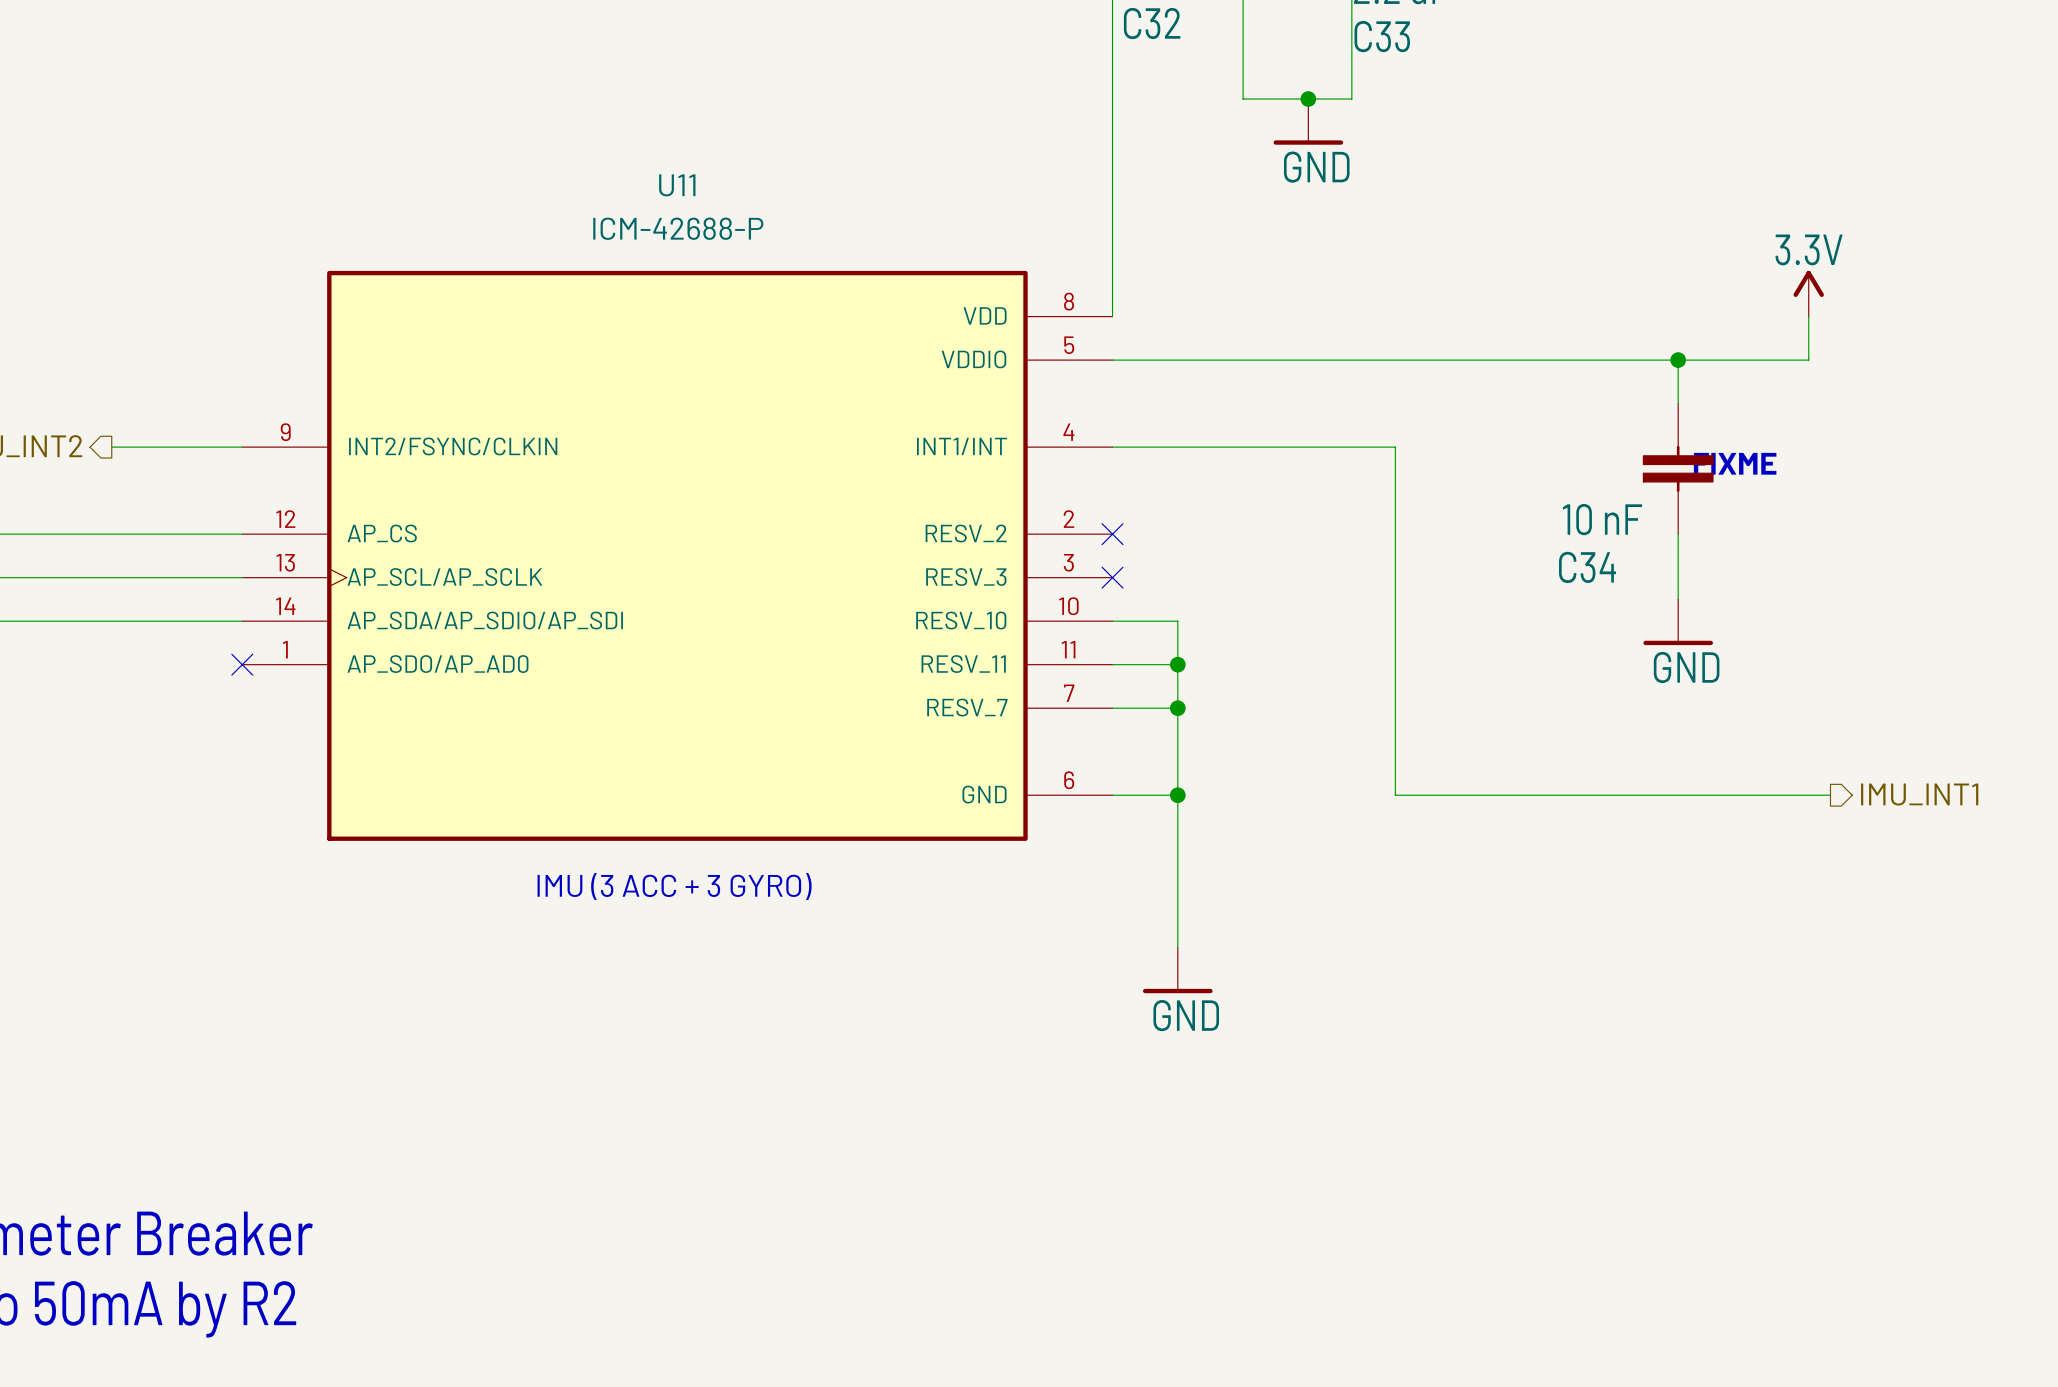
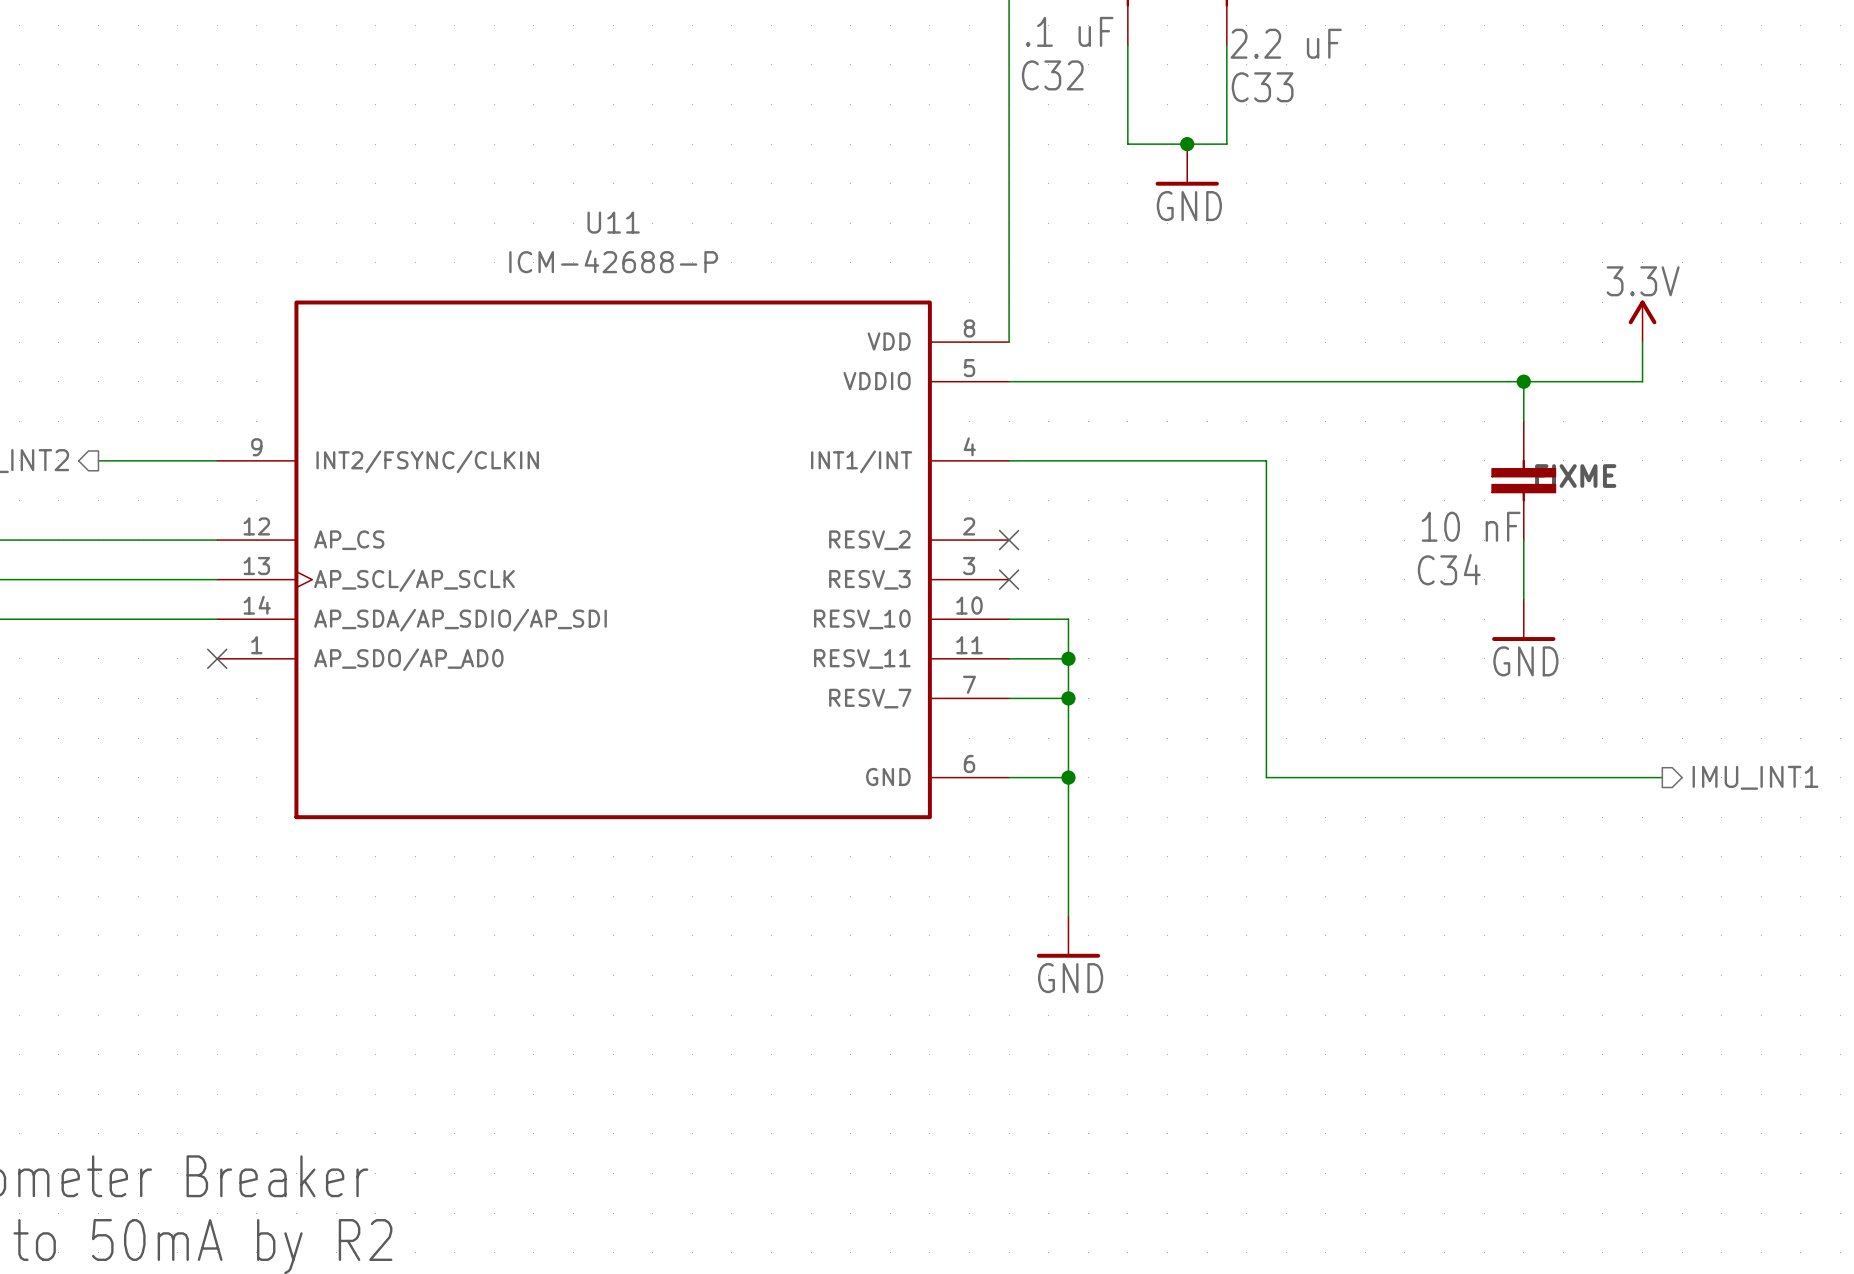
text: IMU (3 ACC + 3 GYRO) (674, 886) -> none

